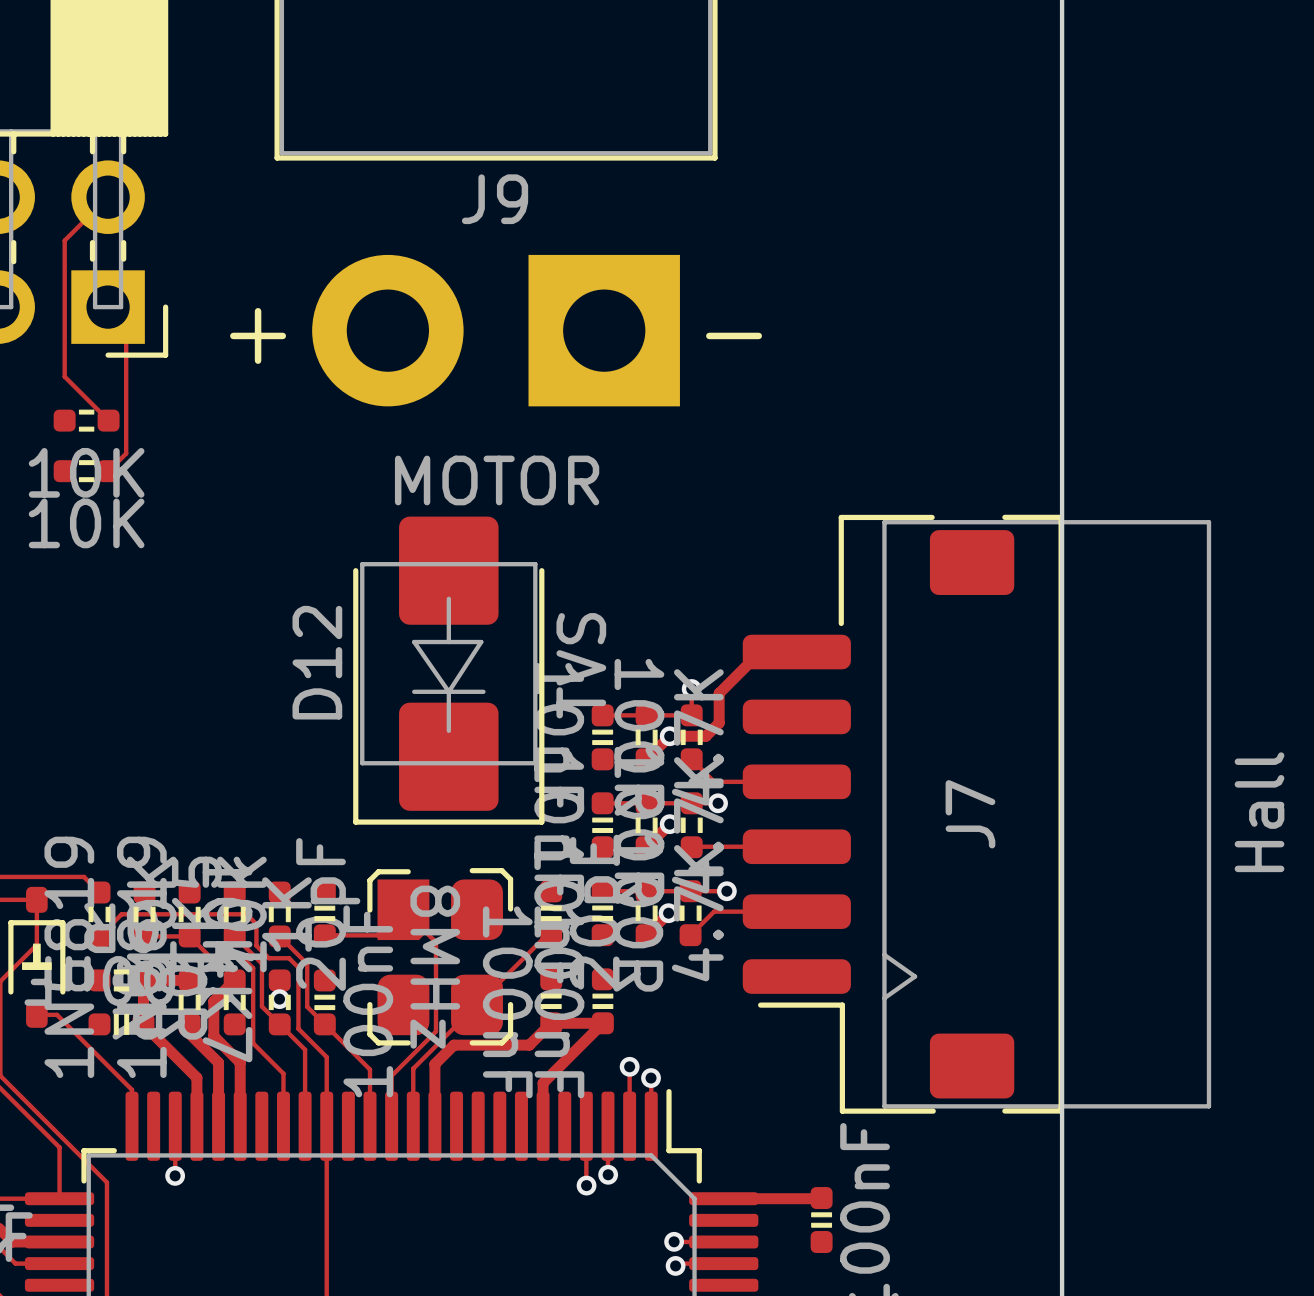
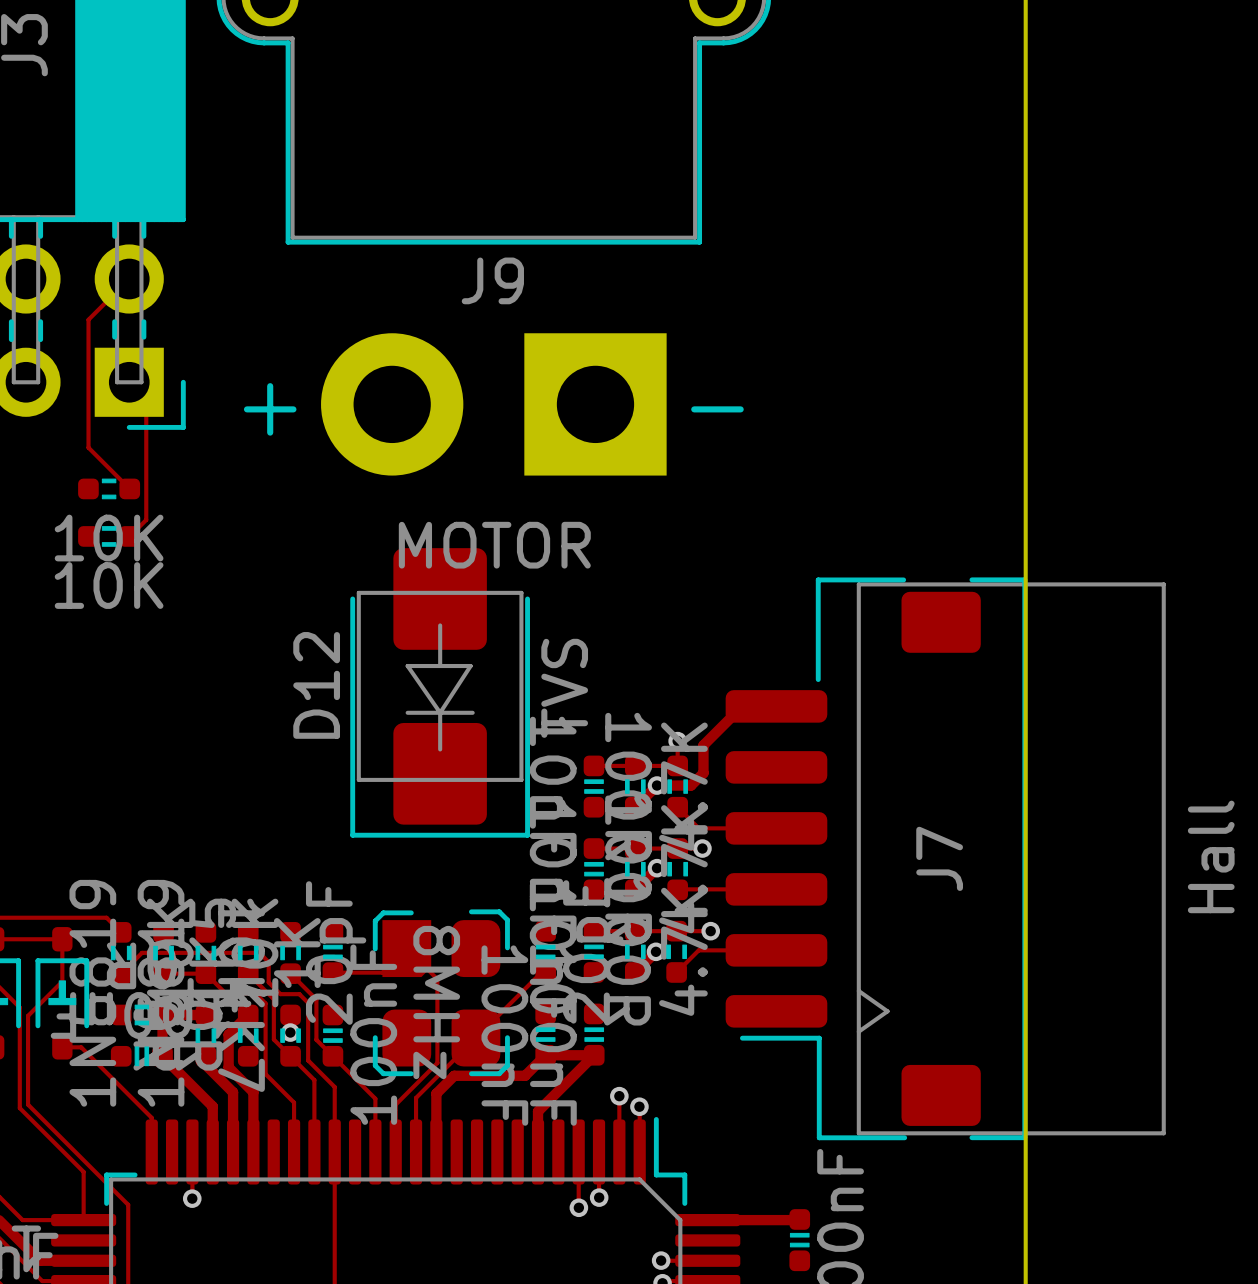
D12 position: (448, 670) -> (440, 692)

